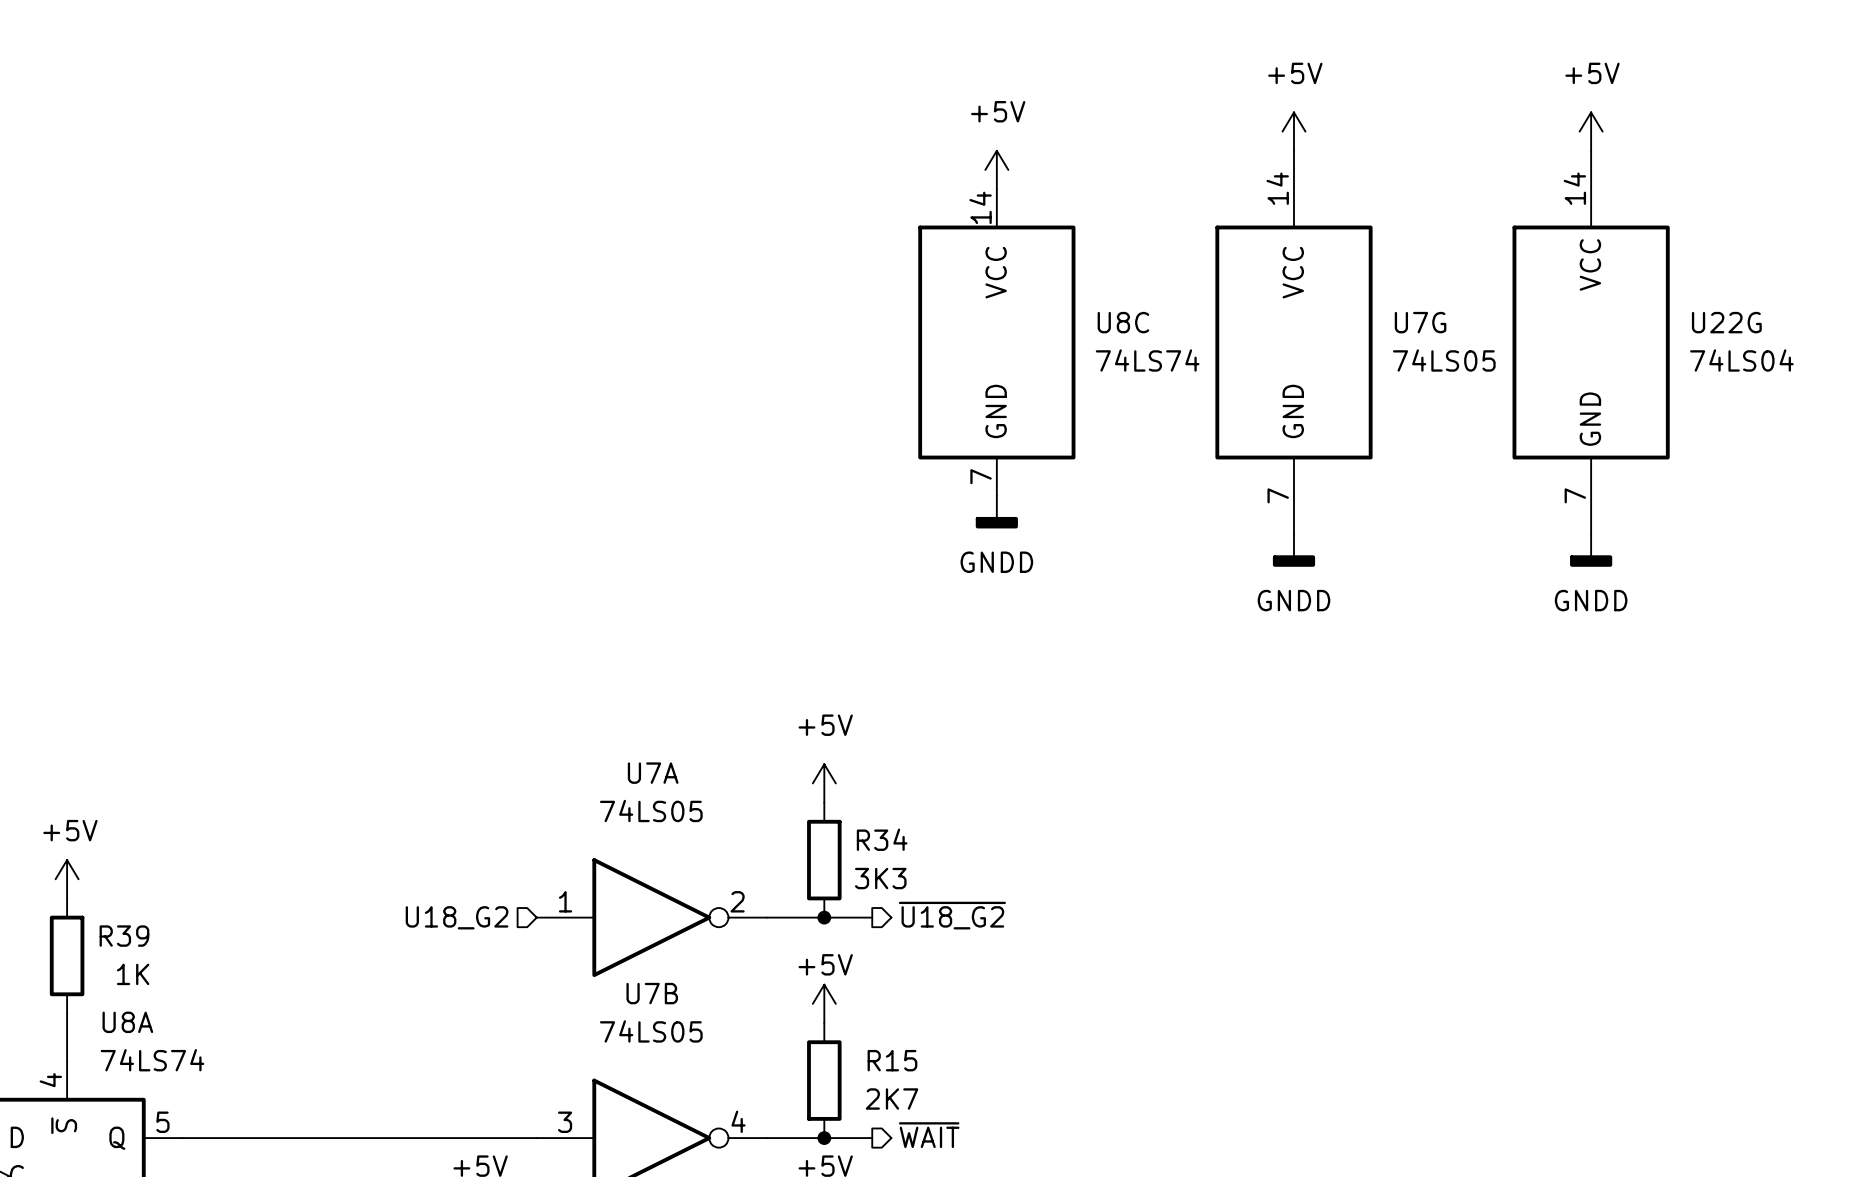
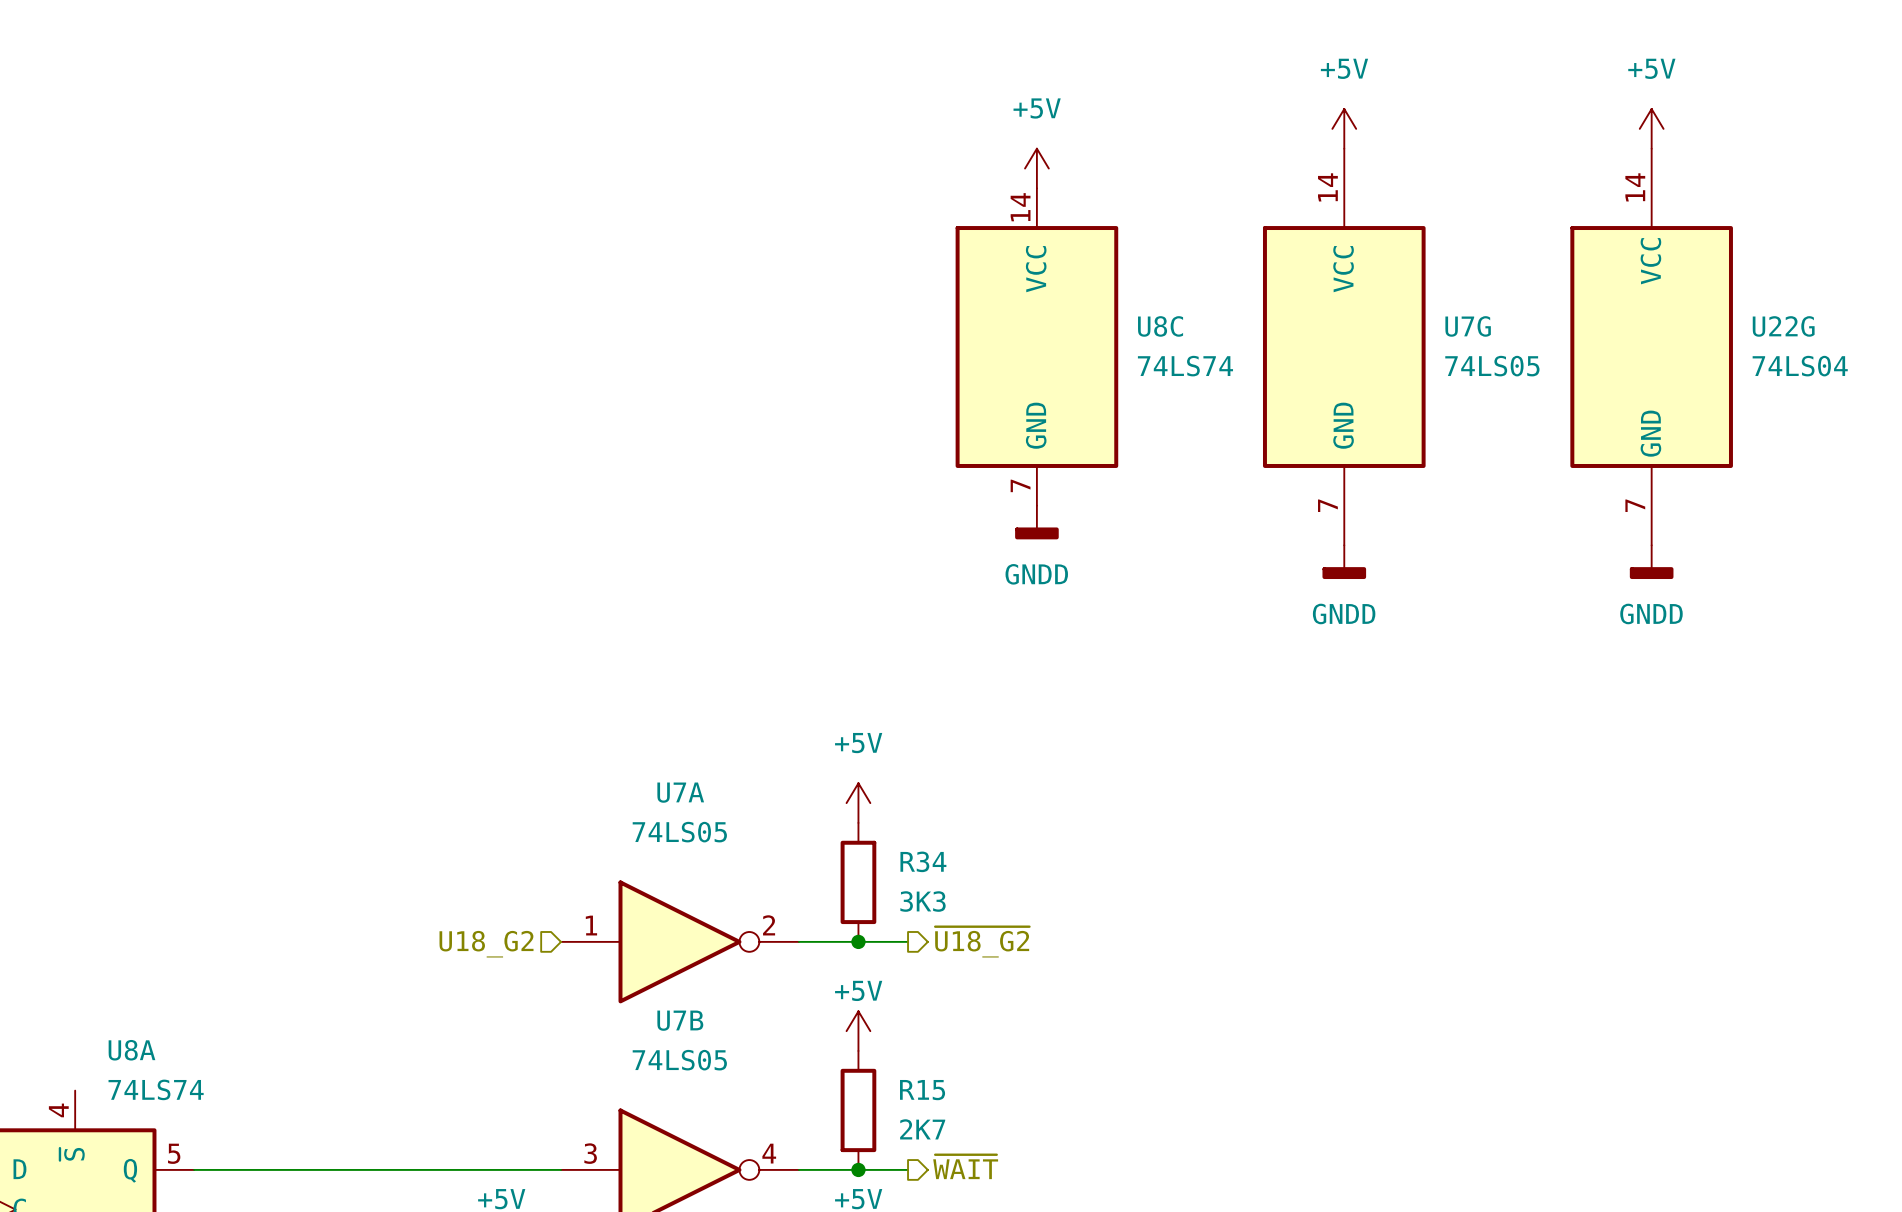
power symbol: +5V (67, 879) -> none
R39: 1K (67, 955) -> none
wire: (67, 1013) (67, 1061) -> none

